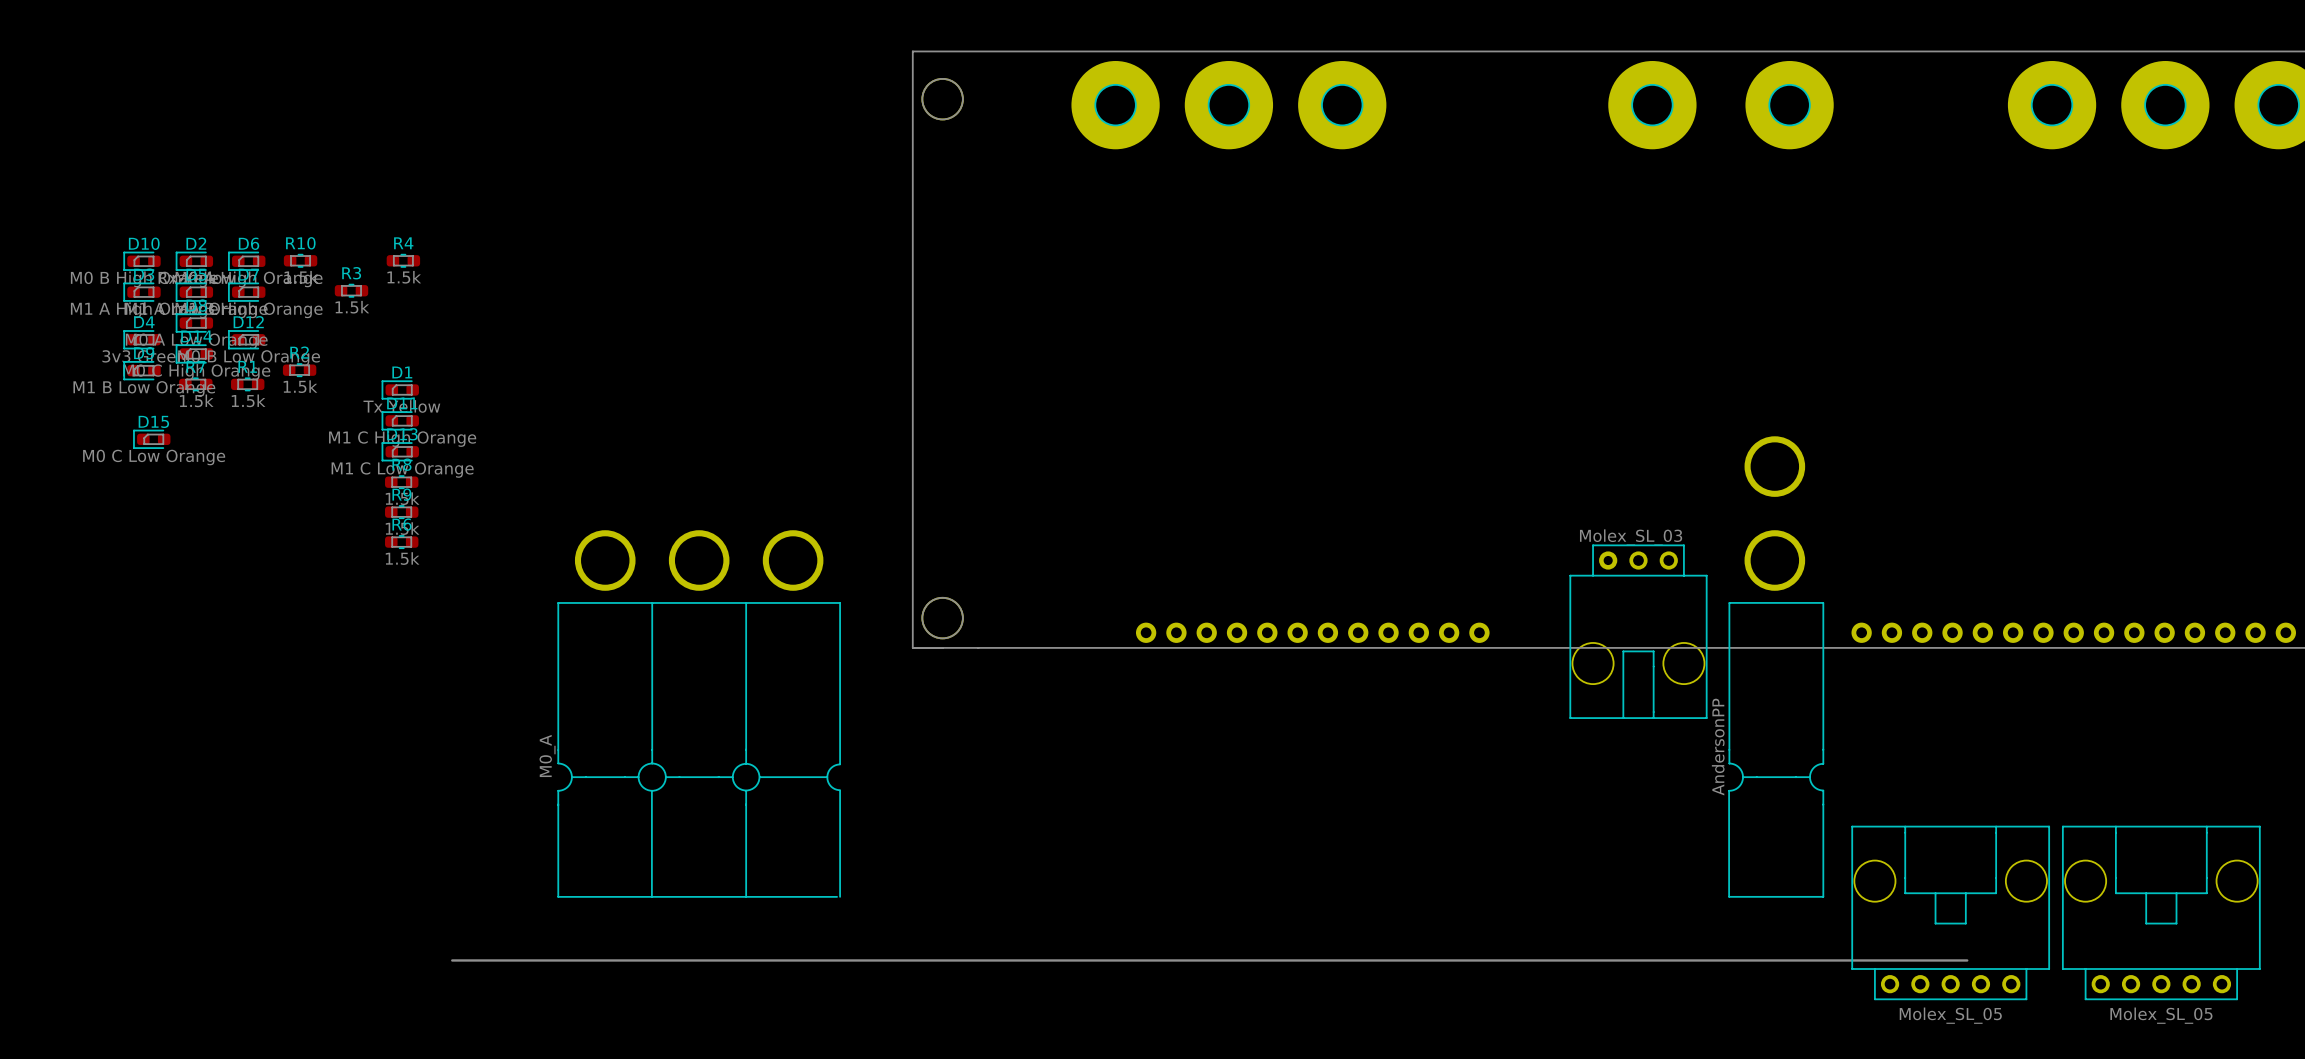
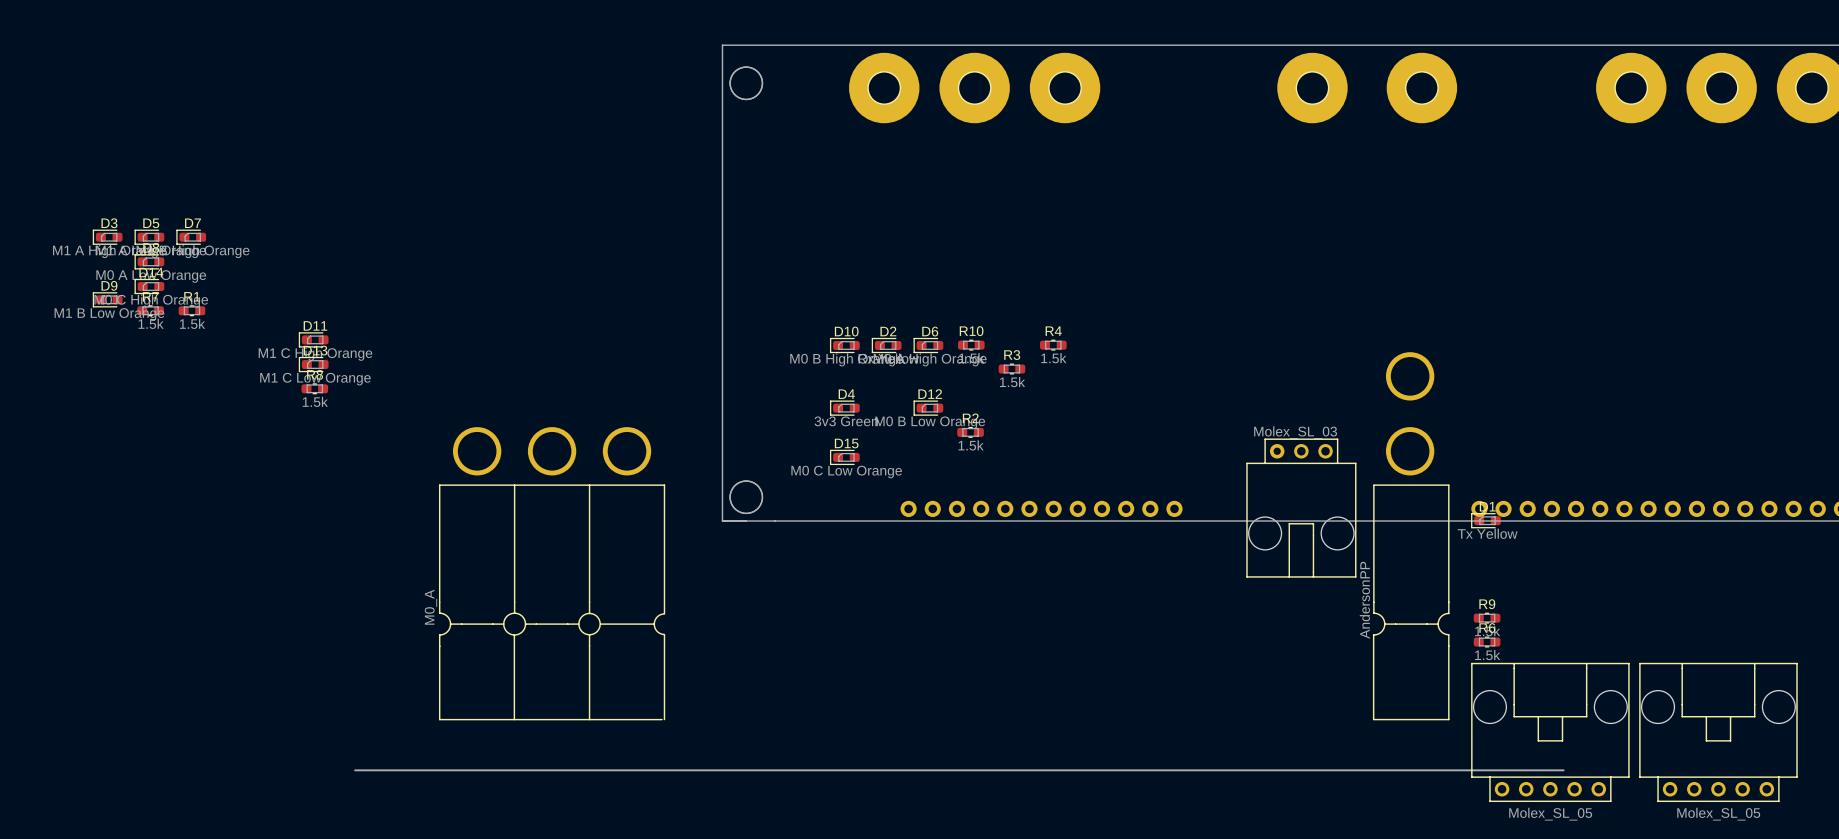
R10 position: (300, 260) -> (971, 345)
R4 position: (403, 260) -> (1053, 345)
D10 position: (142, 261) -> (844, 345)
D2 position: (194, 261) -> (886, 345)
D6 position: (246, 261) -> (928, 345)
R3 position: (351, 290) -> (1011, 369)
D4 position: (142, 339) -> (844, 408)
D12 position: (246, 339) -> (928, 408)
R2 position: (299, 370) -> (970, 432)
D1 position: (400, 389) -> (1485, 520)
D15 position: (151, 439) -> (844, 457)
R9 position: (401, 512) -> (1487, 618)
R6 position: (401, 542) -> (1487, 642)

